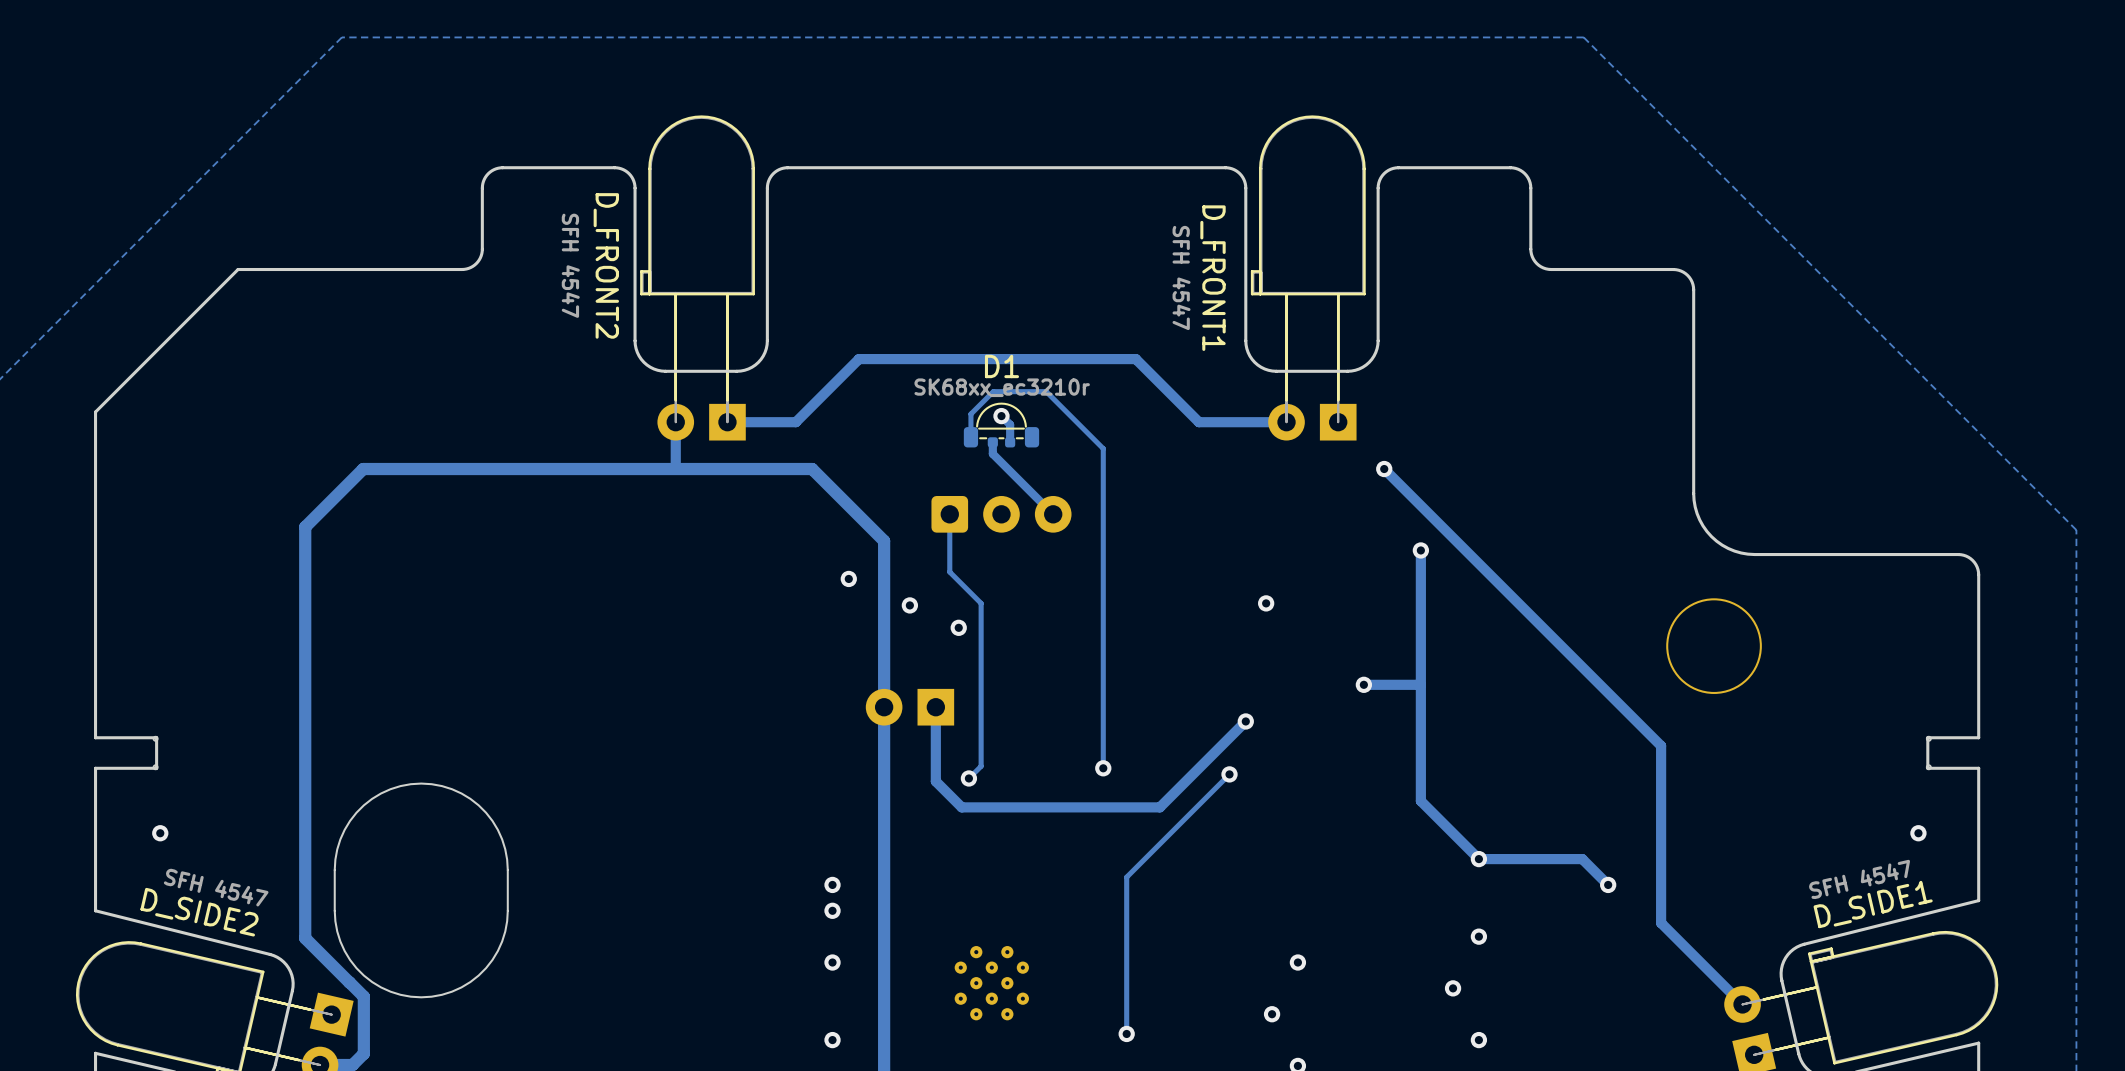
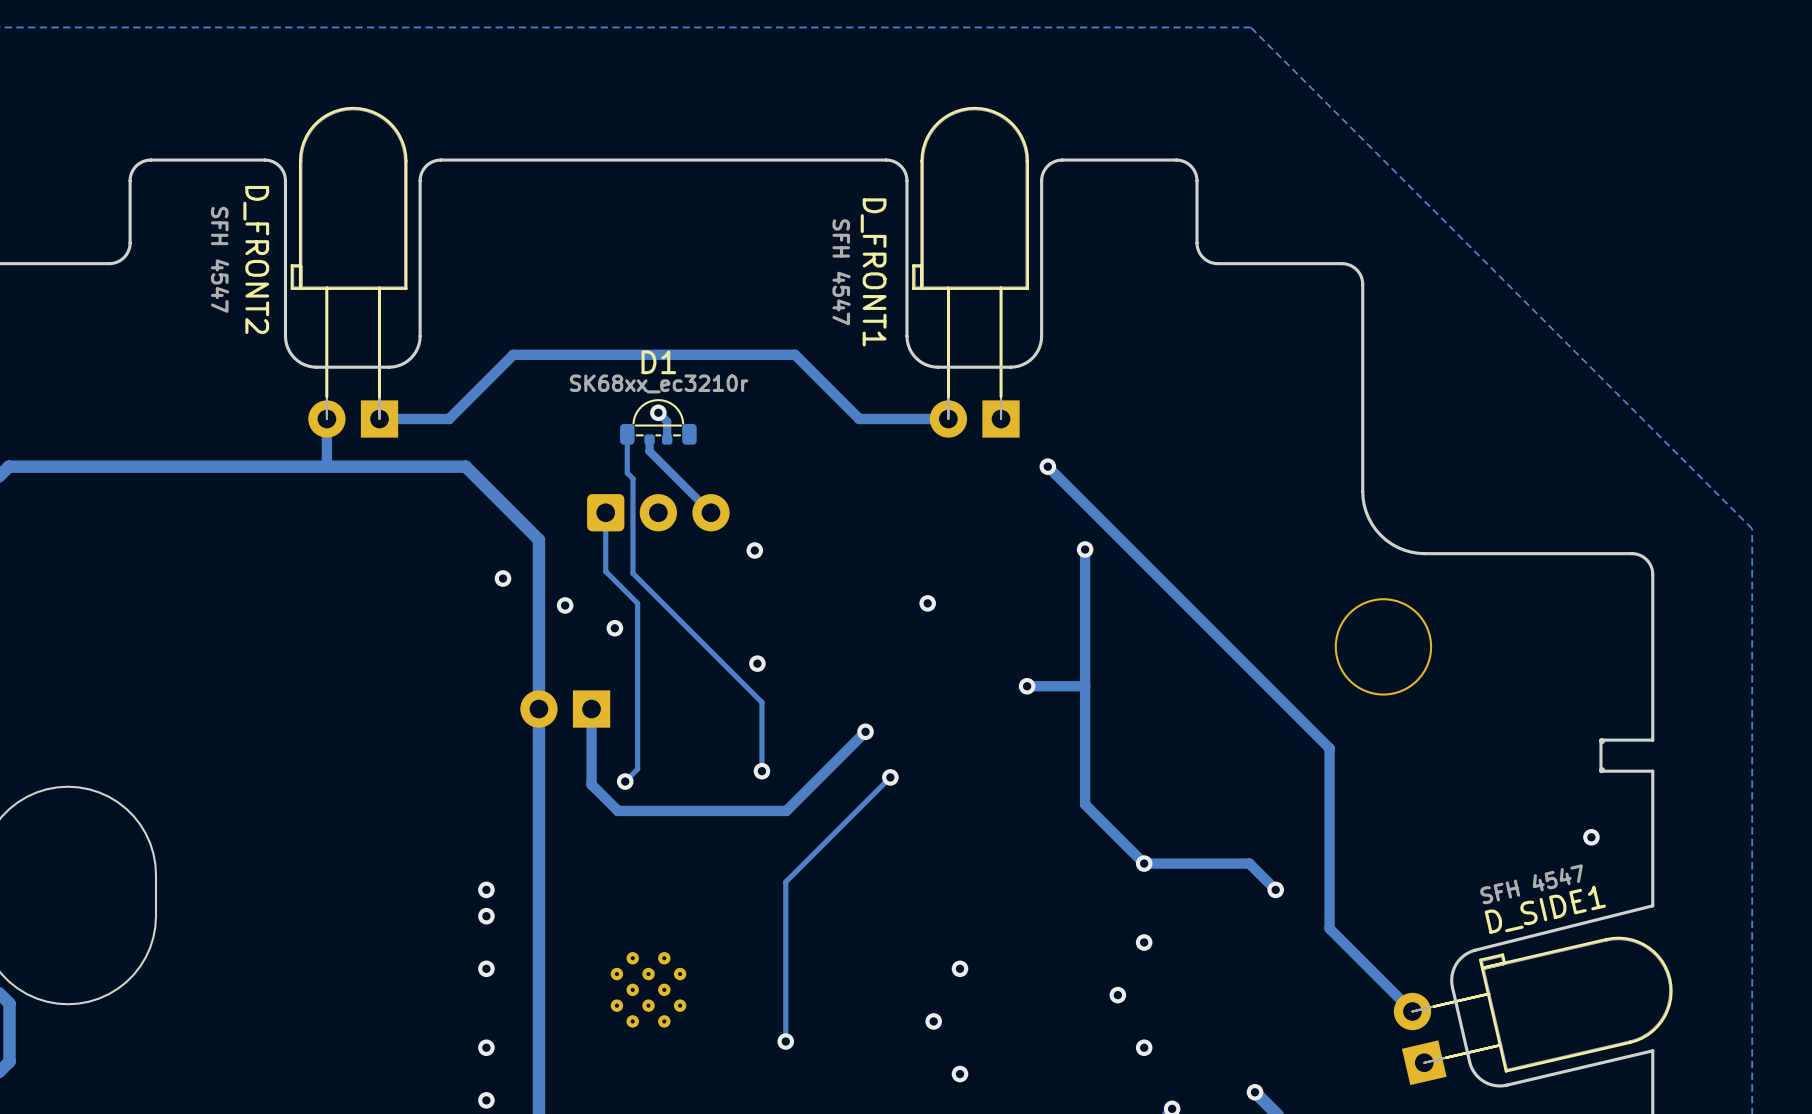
track: (970, 437) (970, 414) (993, 391) (1046, 391) (1103, 448) (1103, 700) -> (627, 434) (627, 472) (632, 478) (632, 573) (761, 702)
via: none -> (754, 550)
via: none -> (757, 663)
track: (1245, 721) (1159, 807) (1127, 807) -> (865, 731) (786, 810)
via position: (1245, 721) -> (865, 731)

